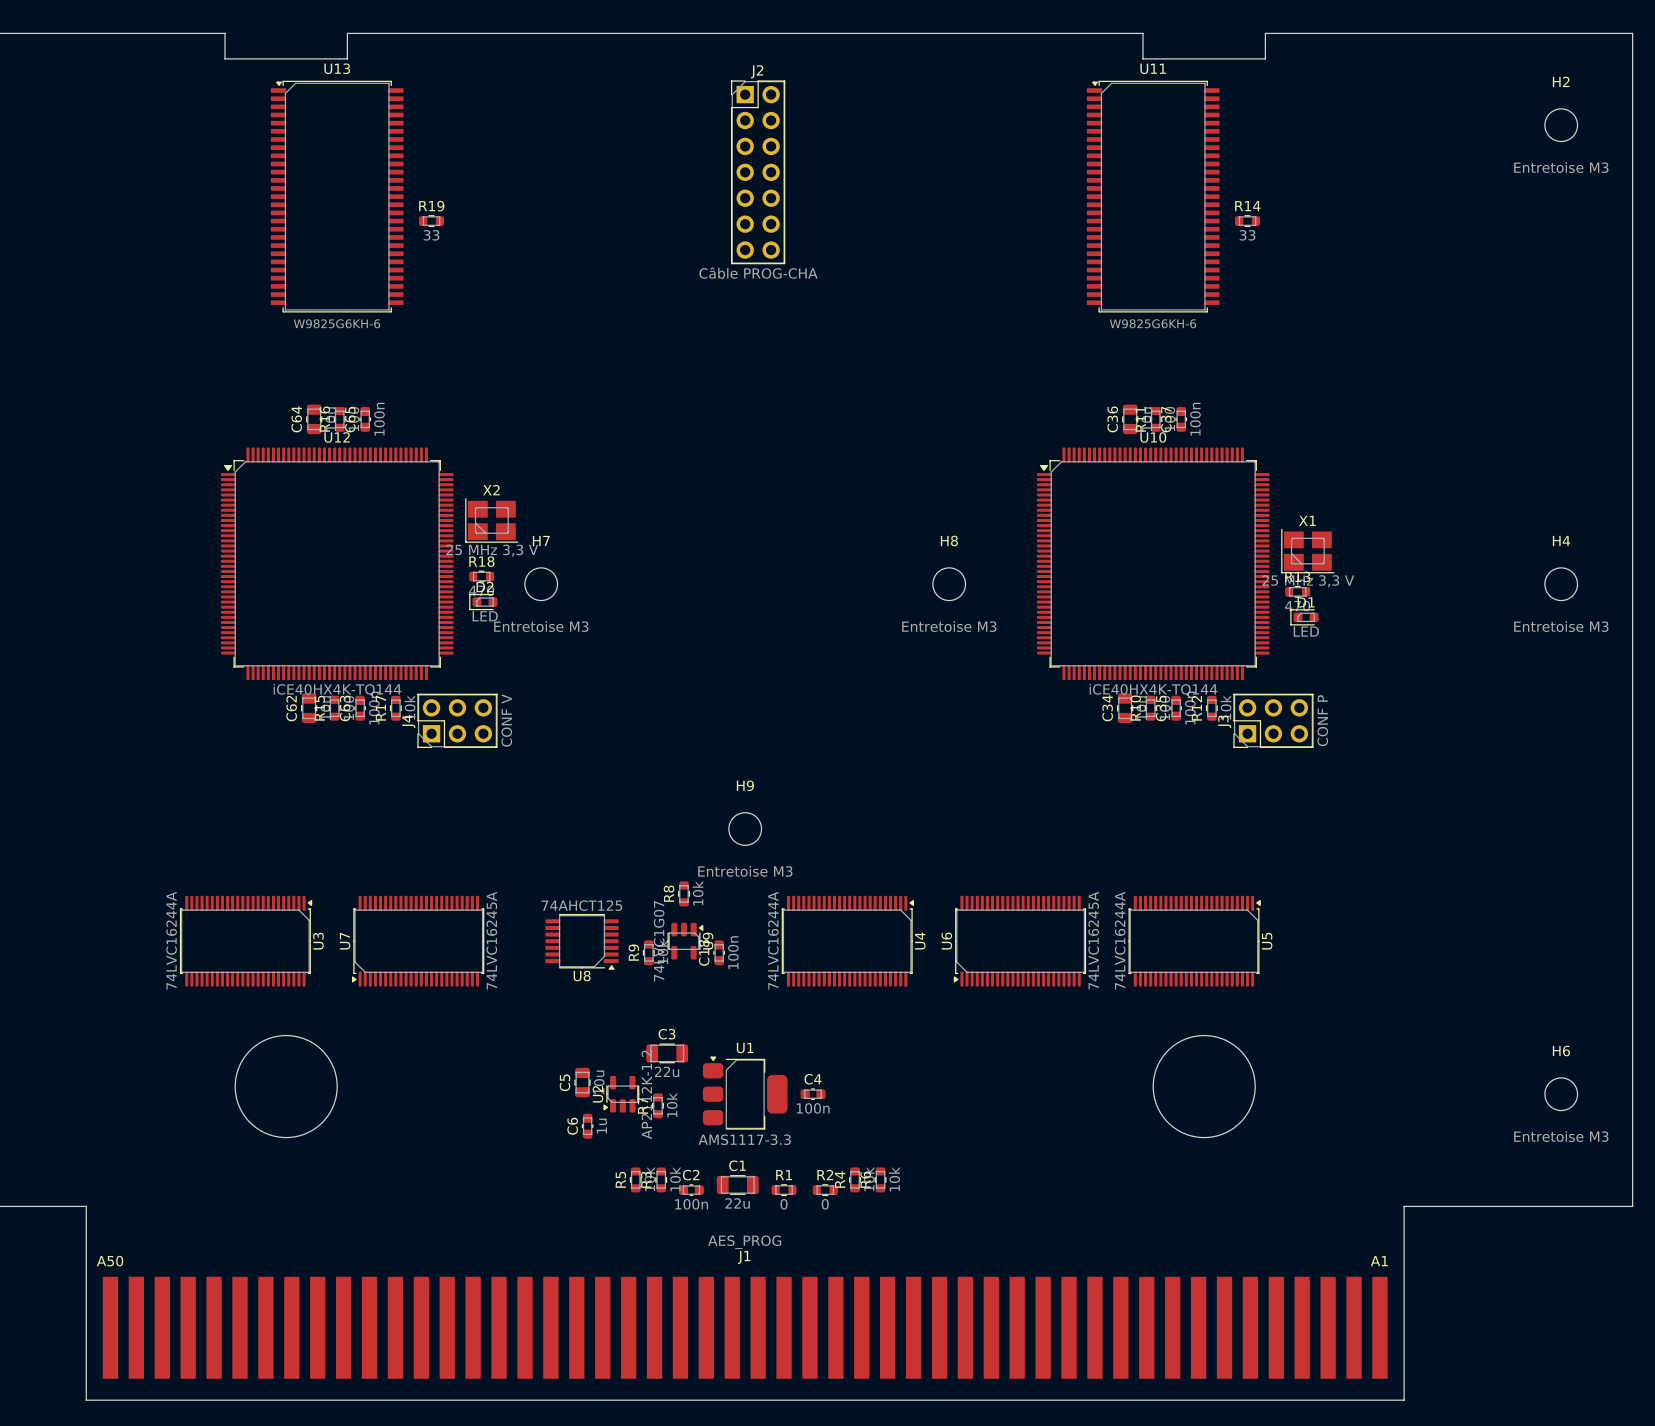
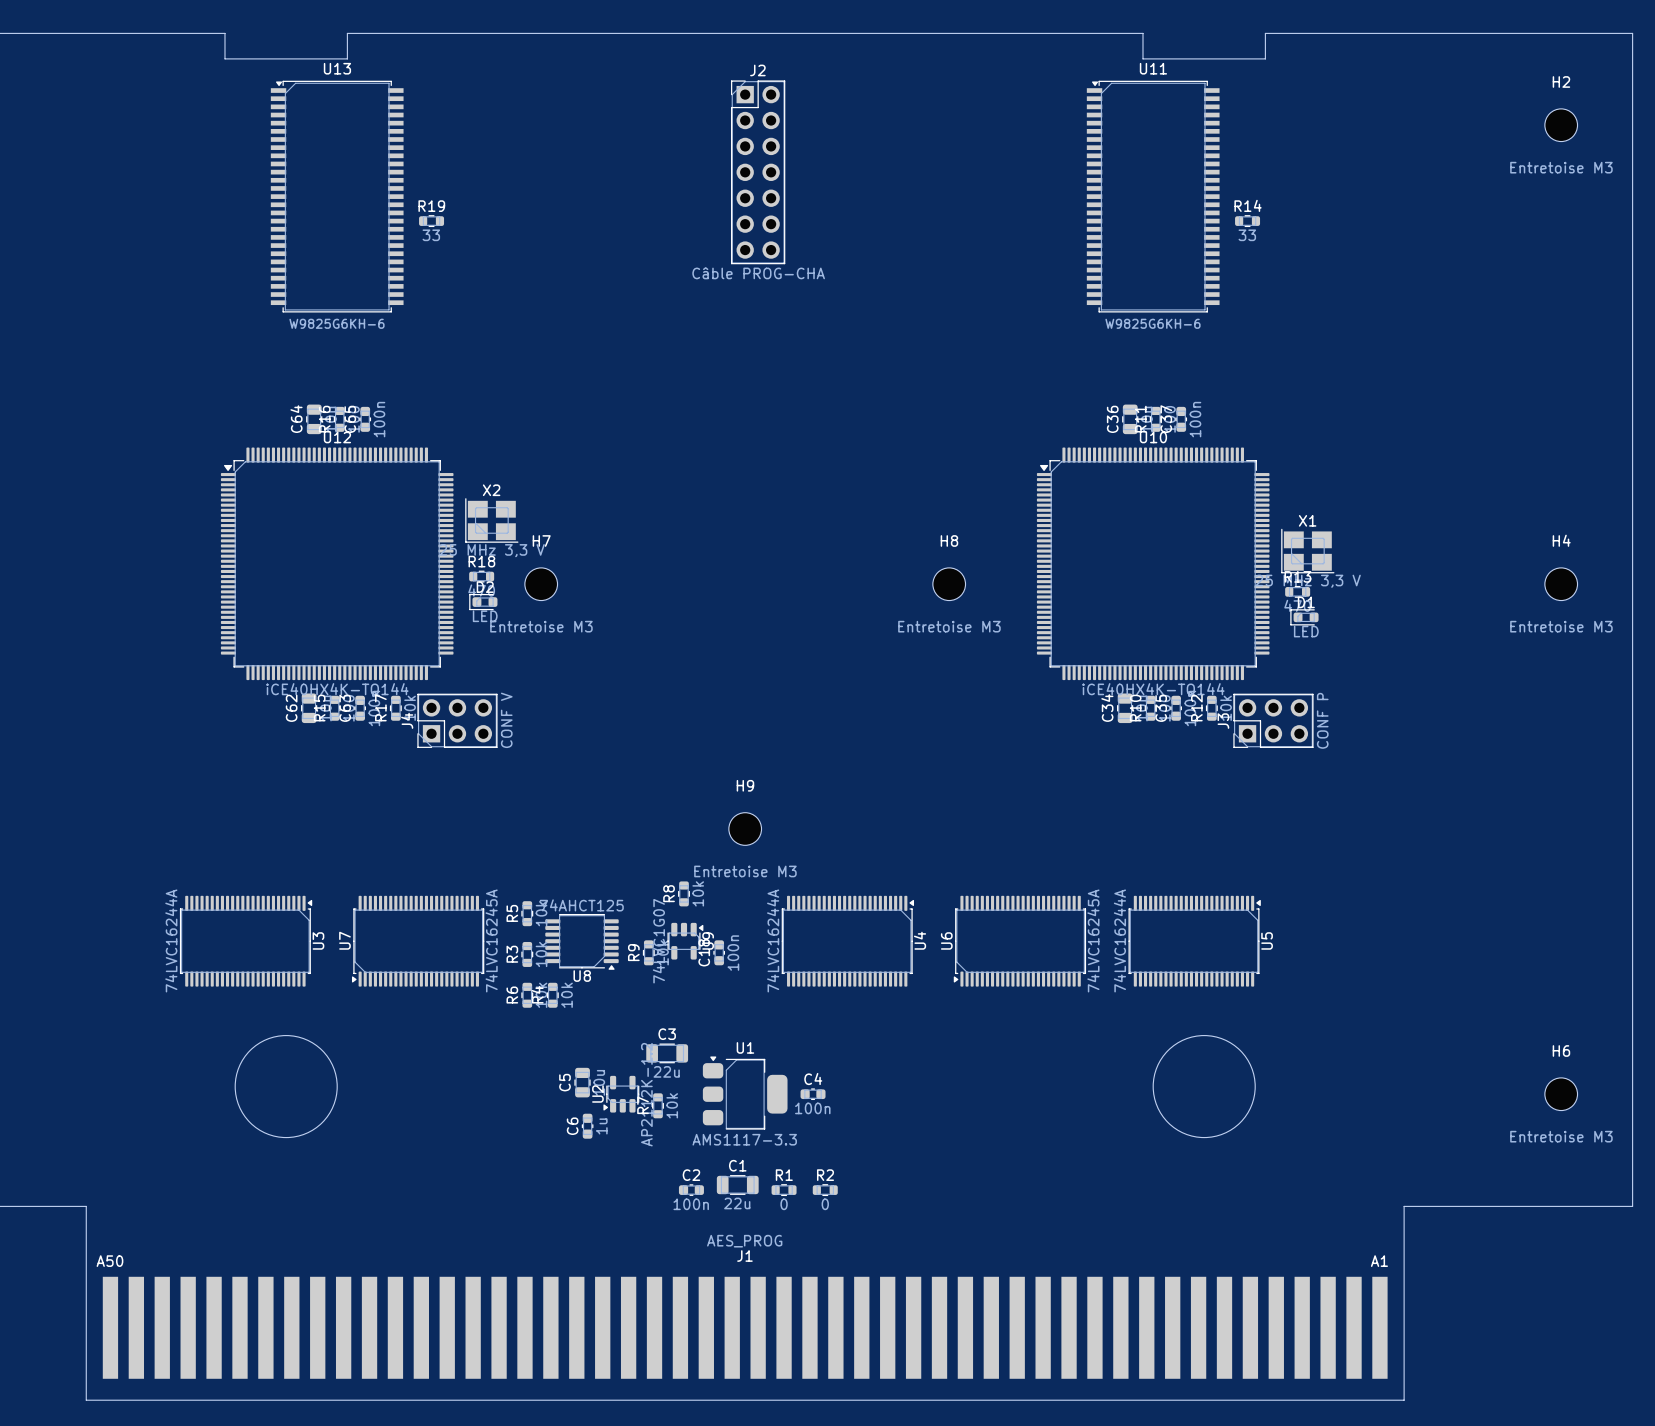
R5 position: (635, 1179) -> (527, 913)
R3 position: (661, 1179) -> (527, 954)
R4 position: (855, 1179) -> (552, 995)
R6 position: (880, 1179) -> (527, 995)

